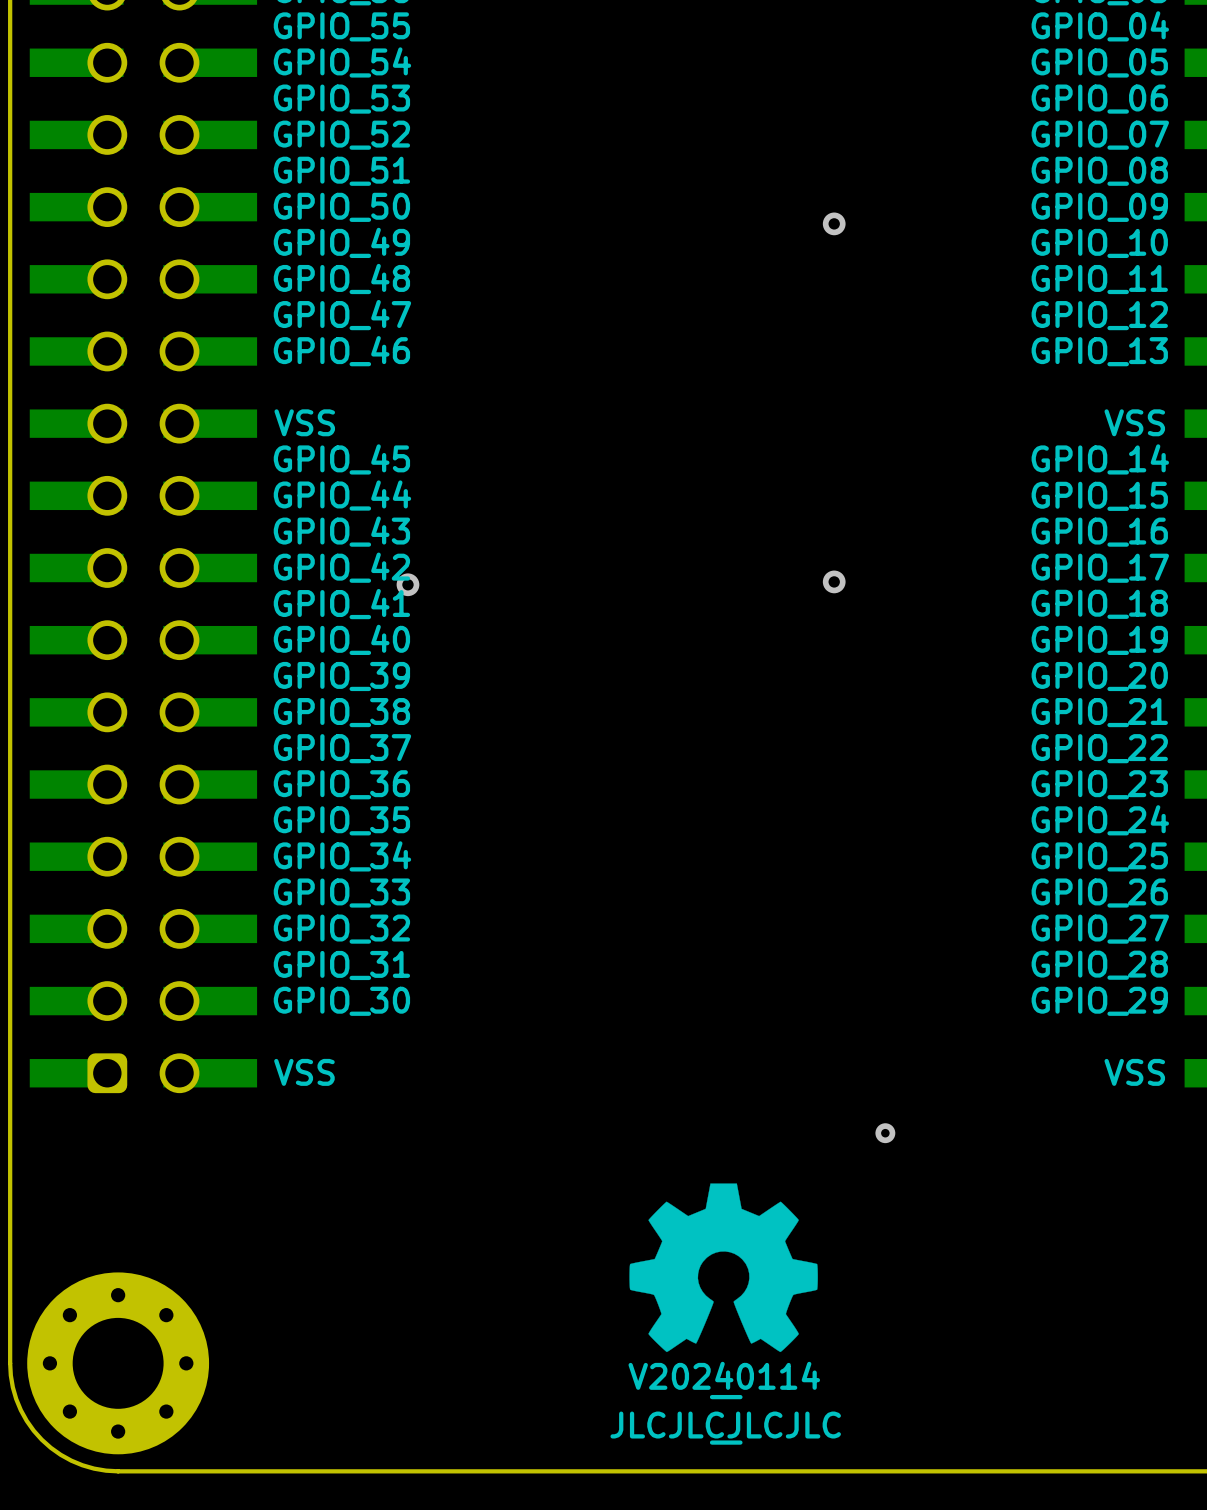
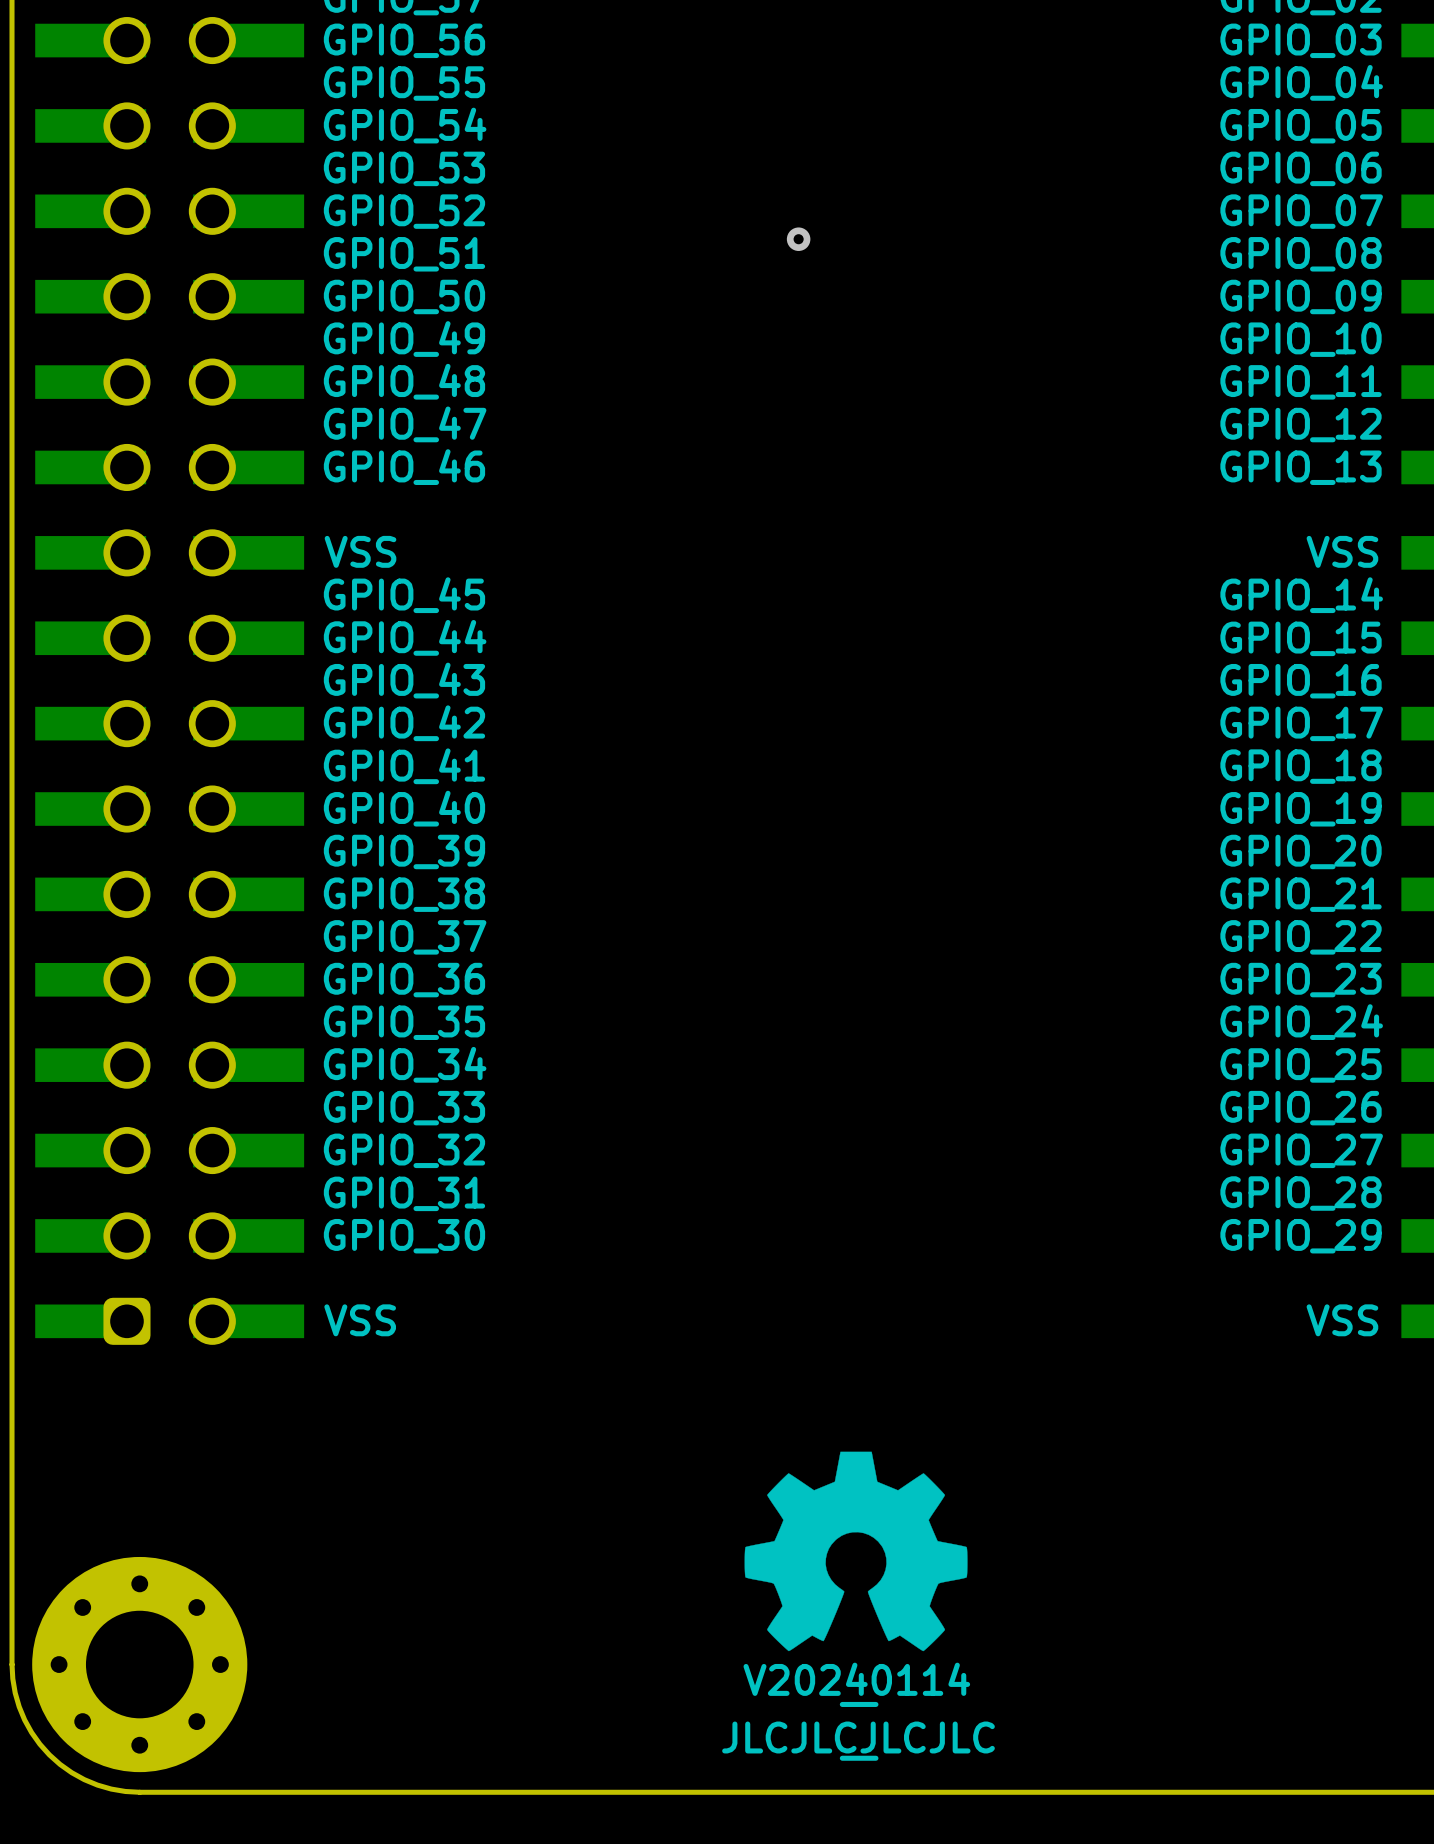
via: none -> (798, 239)
via: (834, 223) -> none
via: (834, 581) -> none
via: (407, 584) -> none
via: (885, 1133) -> none

